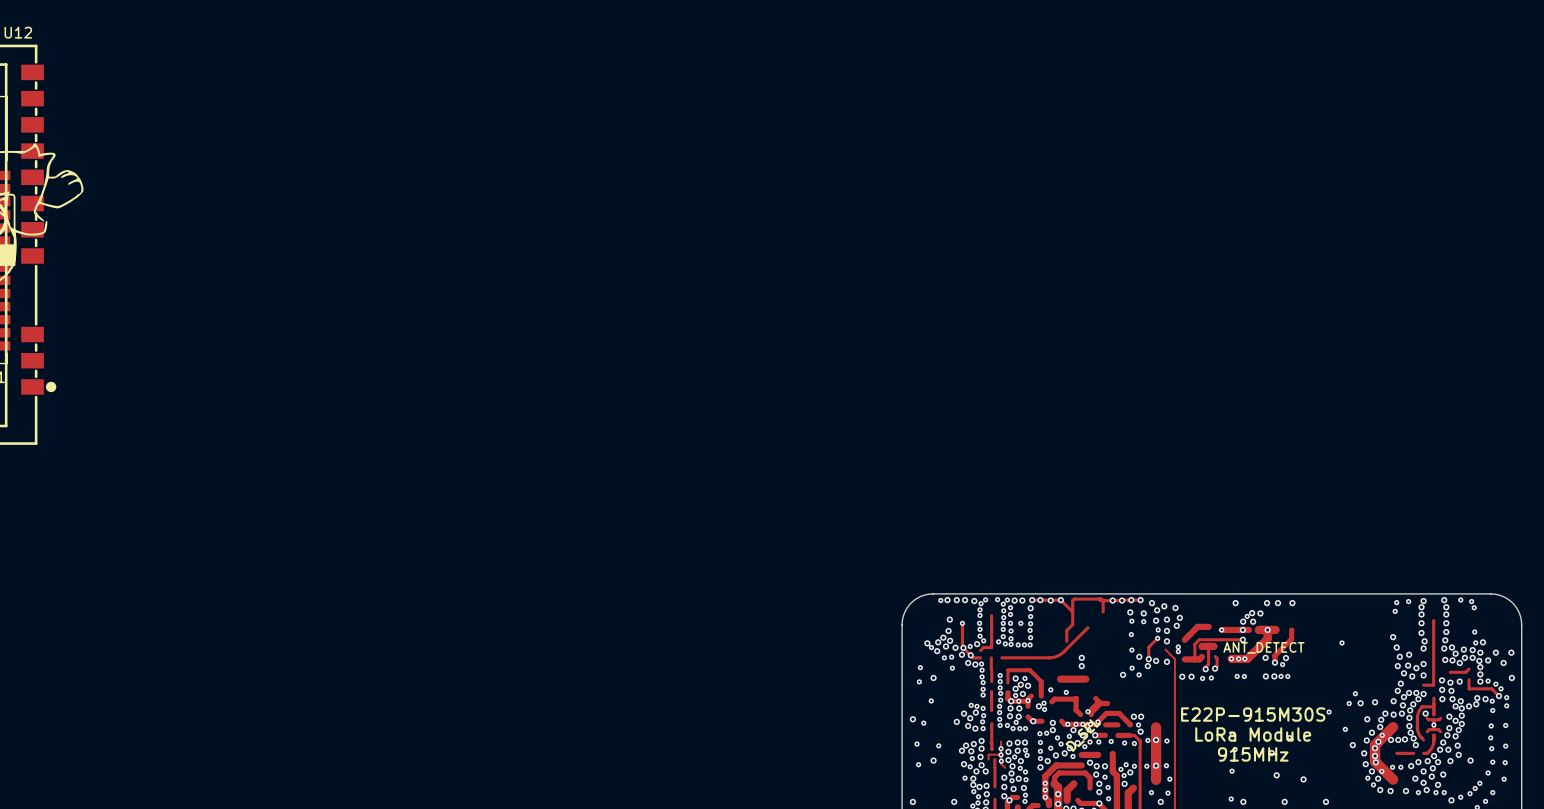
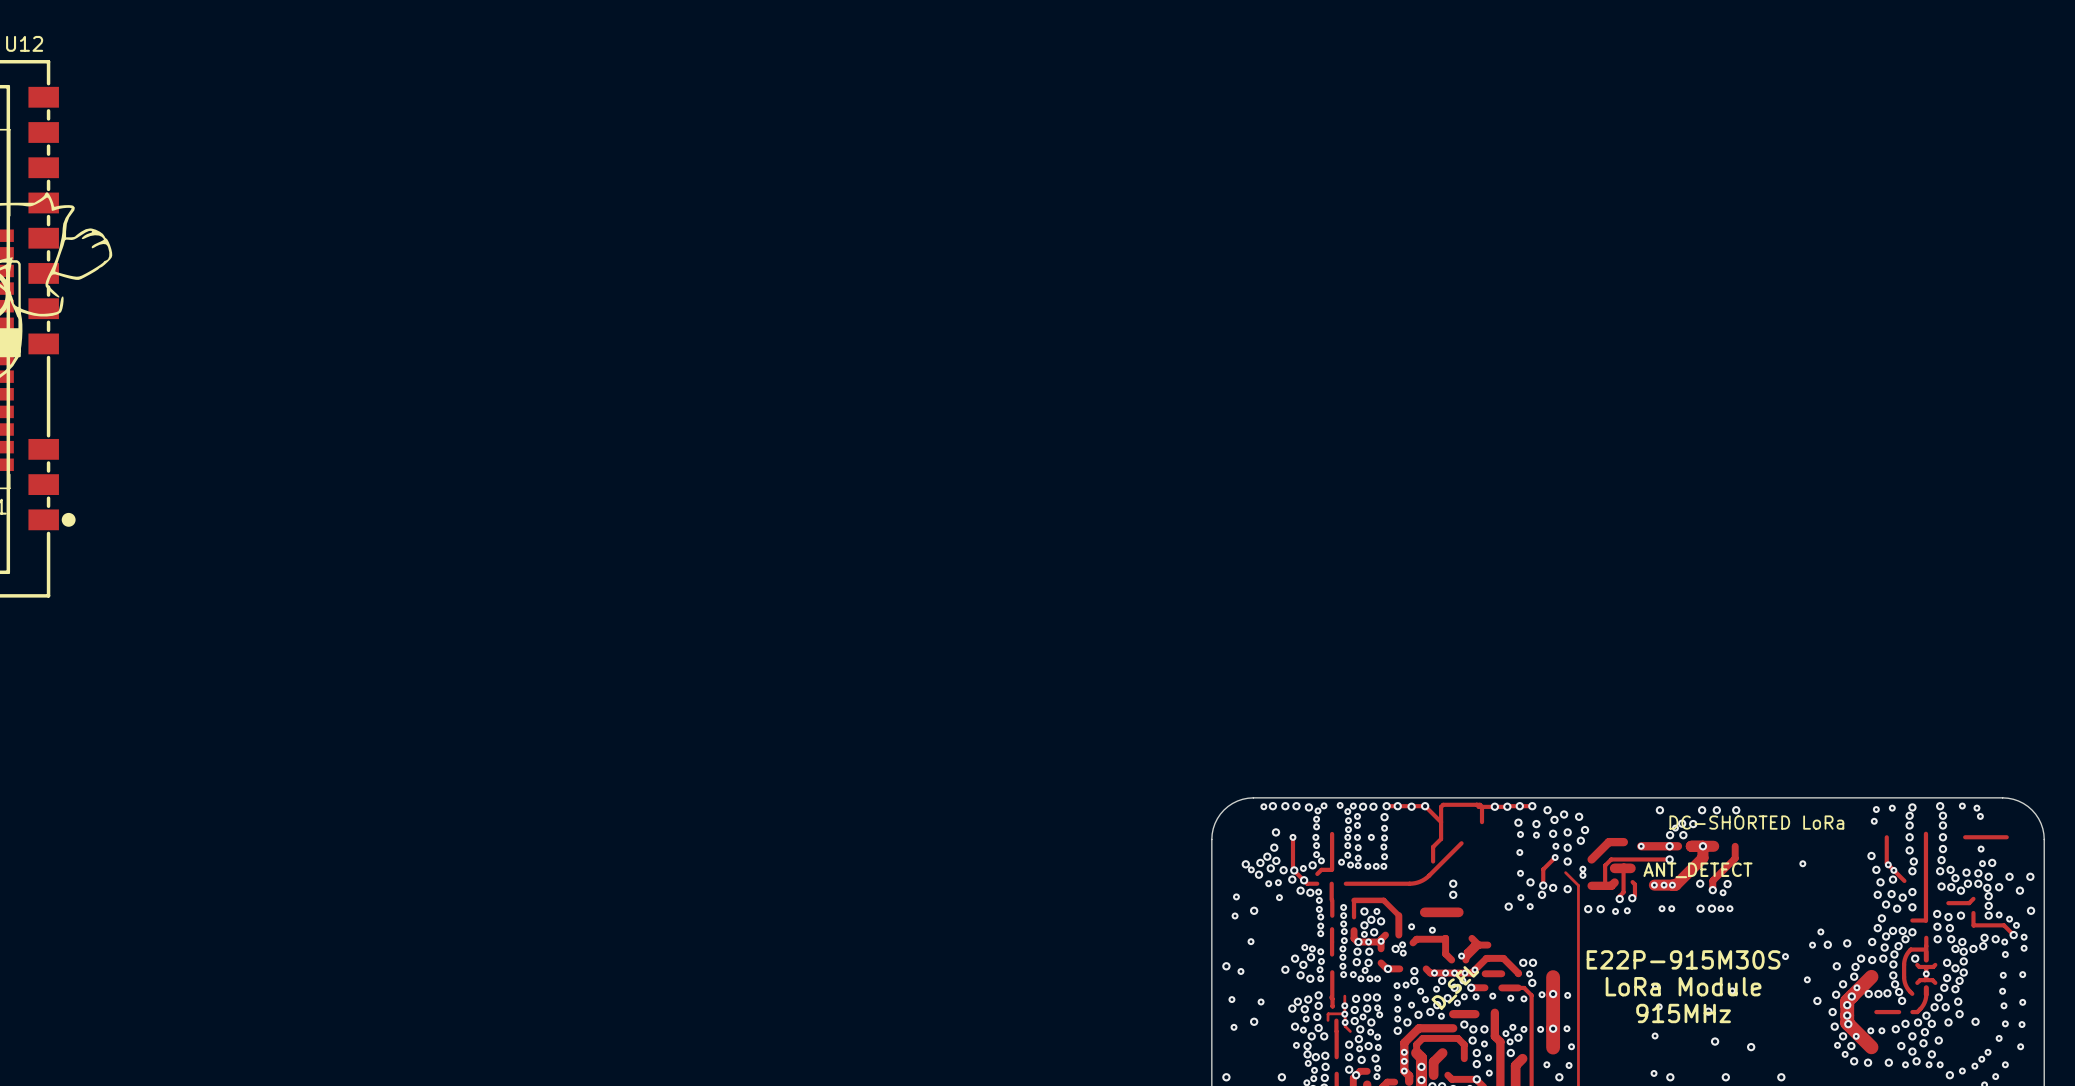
text: none -> DC-SHORTED LoRa (1756, 822)
track: (991, 615) (991, 620) -> none
track: none -> (1886, 837) (1886, 863) (1904, 880)
track: none -> (1965, 837) (2006, 837)
via: none -> (1888, 864)
via: none -> (1893, 870)

